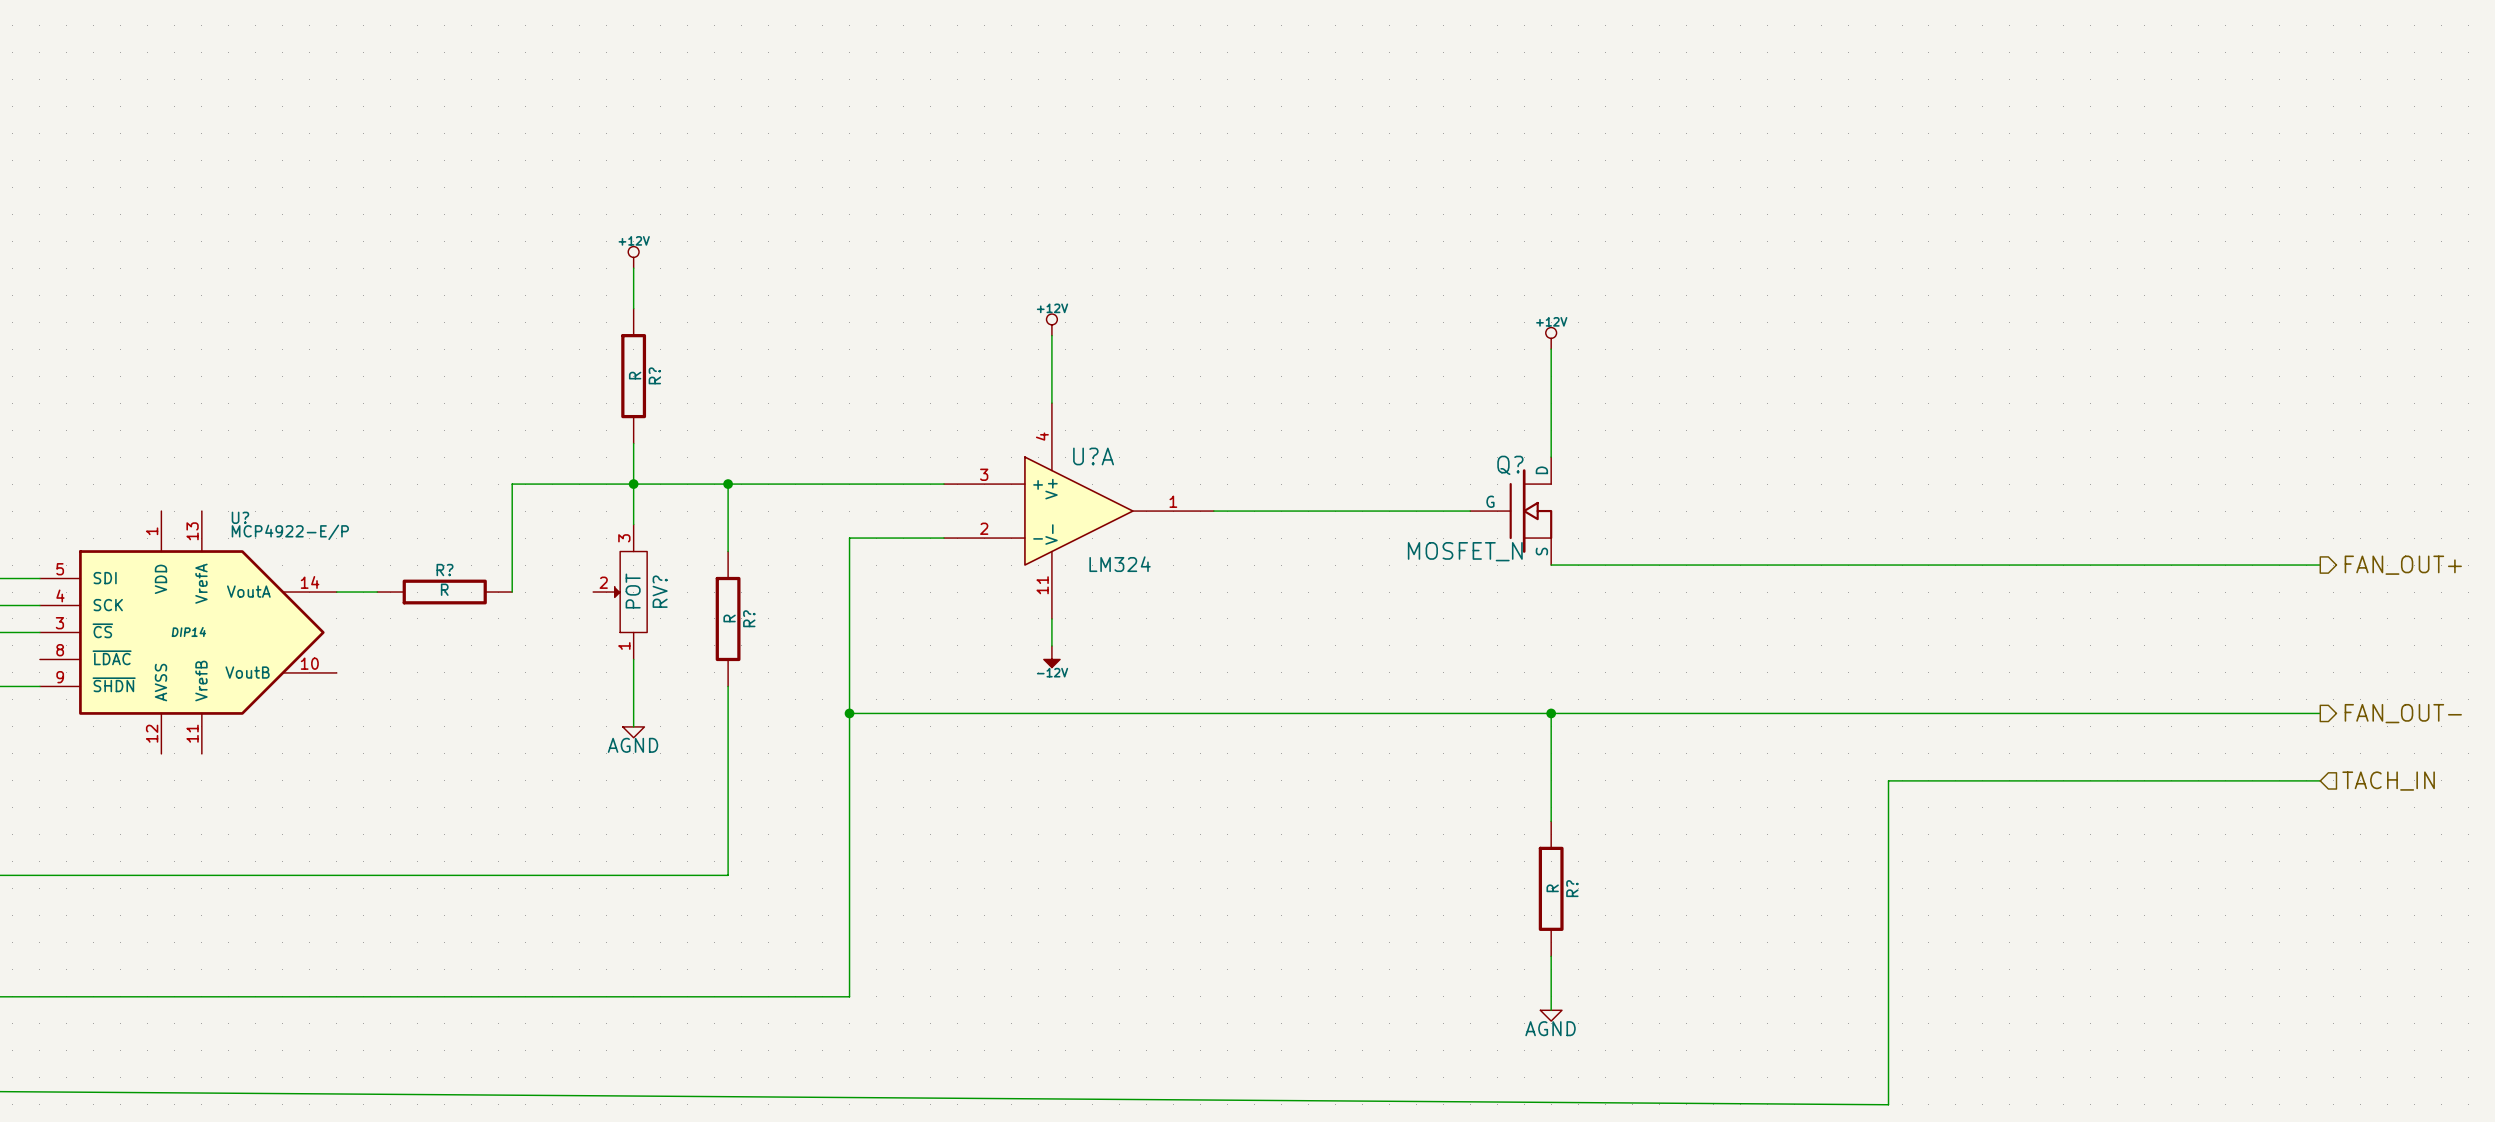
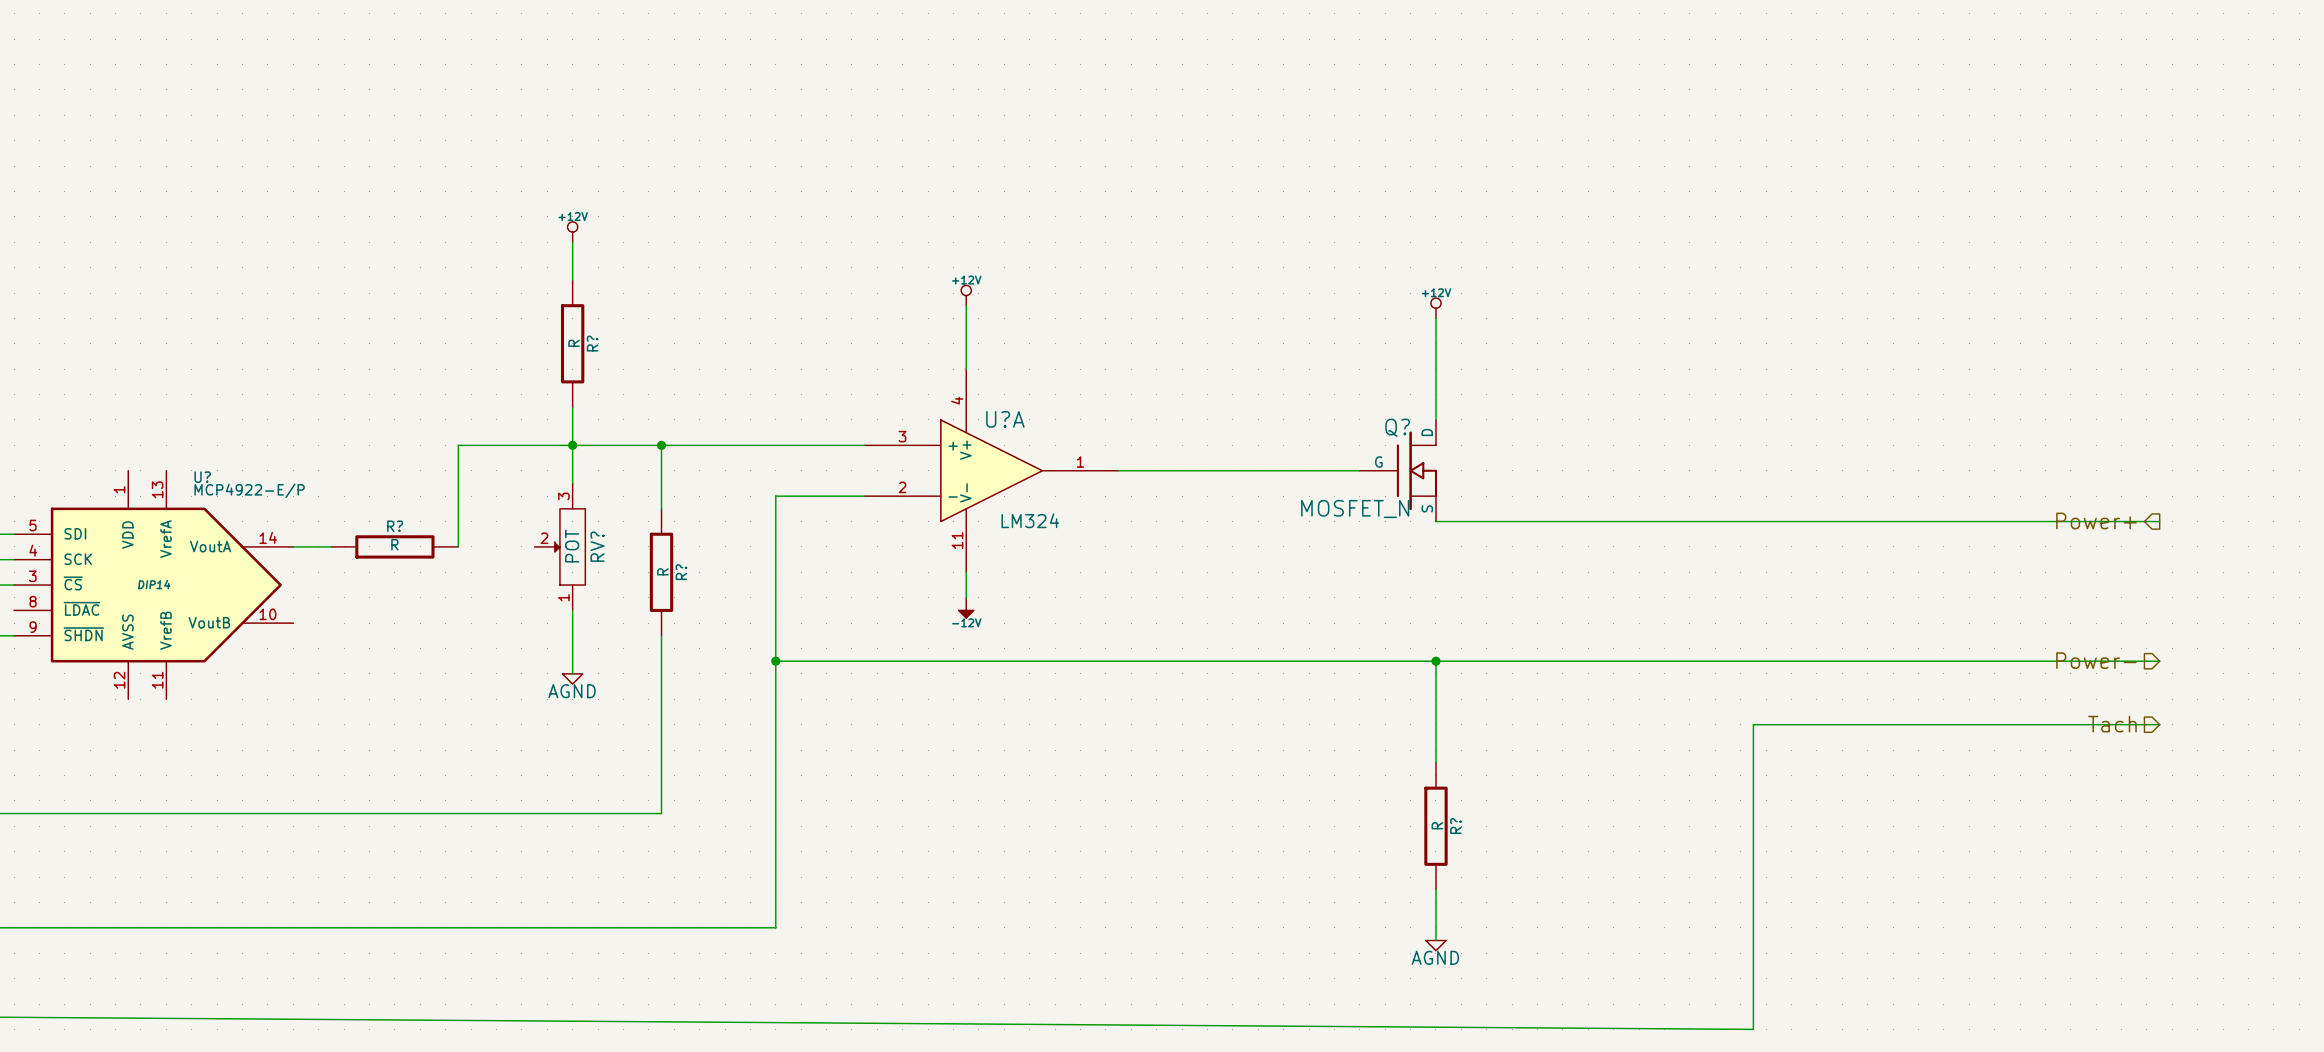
hierarchical label: none -> Power+ (2096, 520)
hierarchical label: FAN_OUT+ (2403, 565) -> none
hierarchical label: none -> Power- (2096, 660)
hierarchical label: FAN_OUT- (2403, 713) -> none
hierarchical label: none -> Tach (2112, 724)
hierarchical label: TACH_IN (2388, 781) -> none

